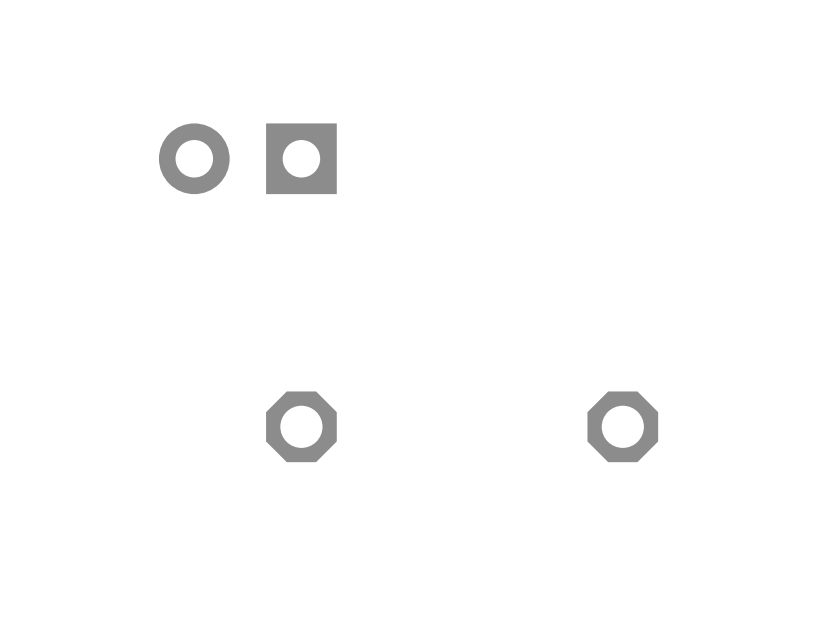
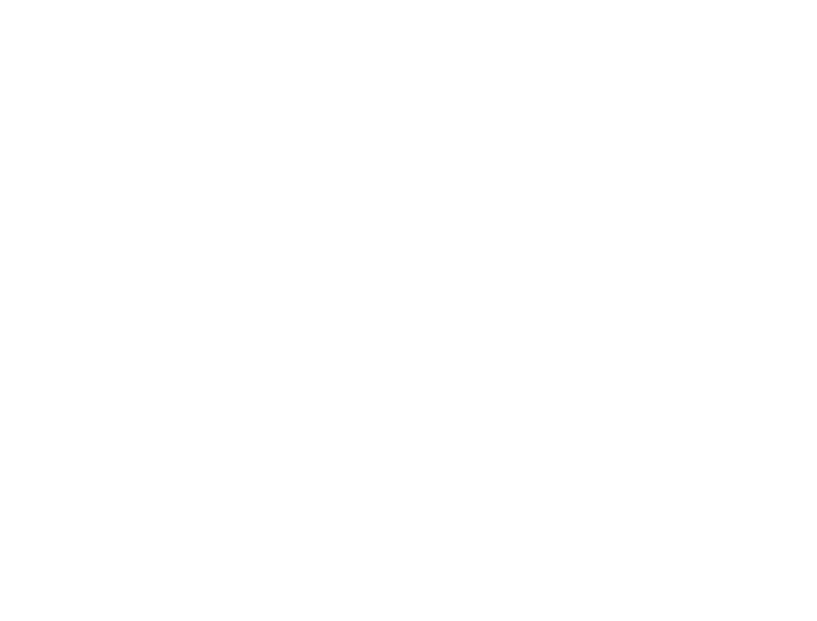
part: (247, 158) -> none
part: (301, 426) -> none
part: (622, 426) -> none

